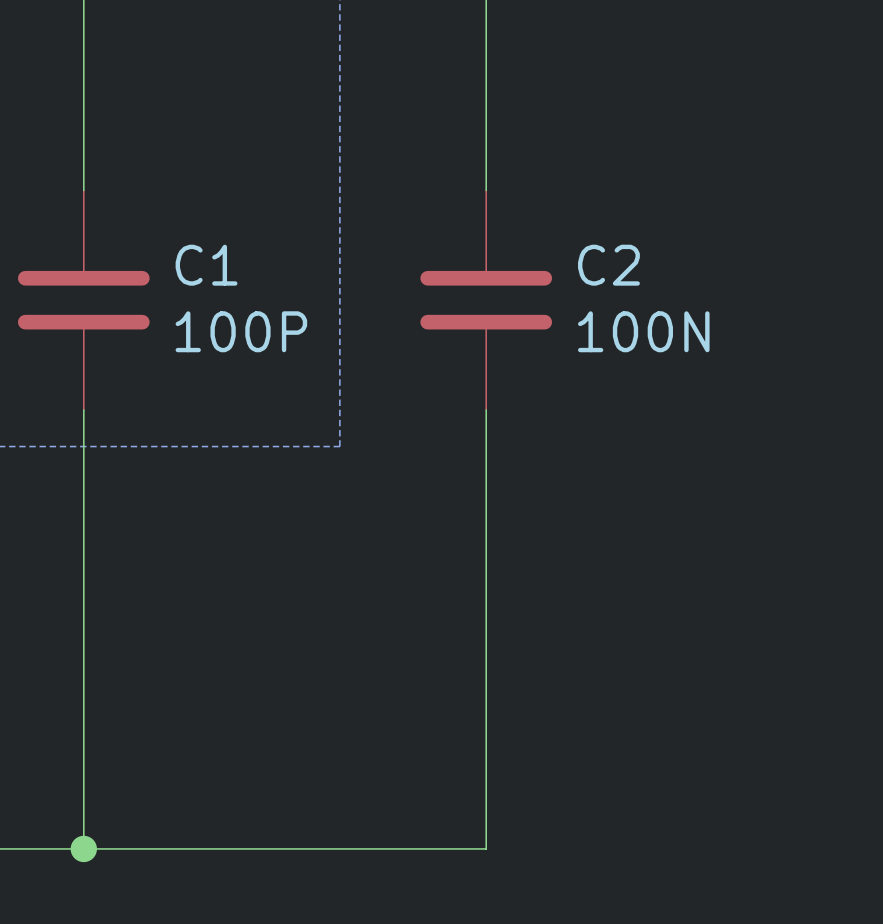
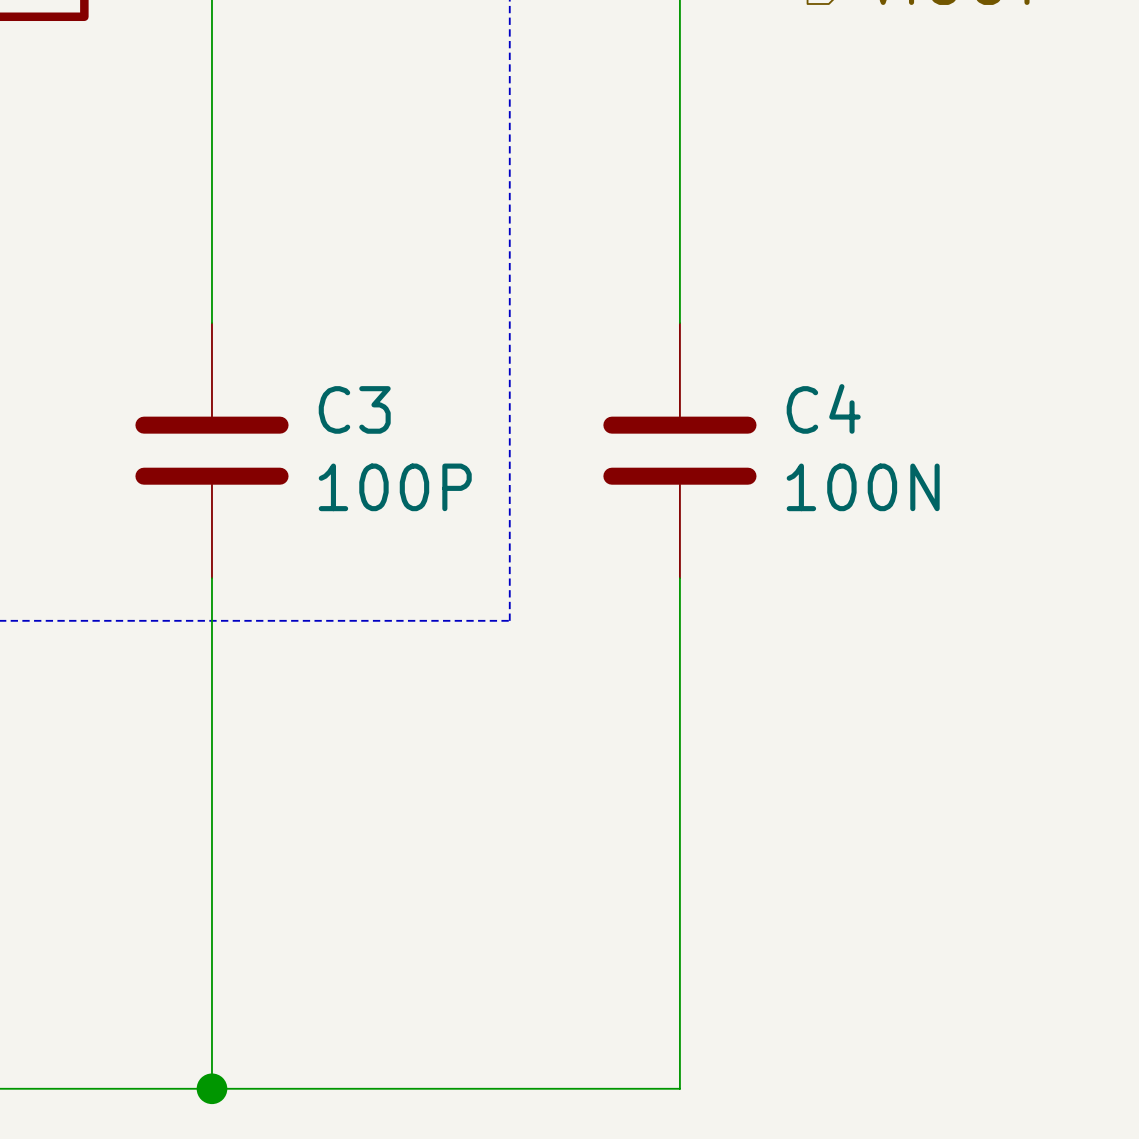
C1 name: C1 (206, 265) -> C3 (354, 409)
C2 name: C2 (608, 265) -> C4 (823, 408)

